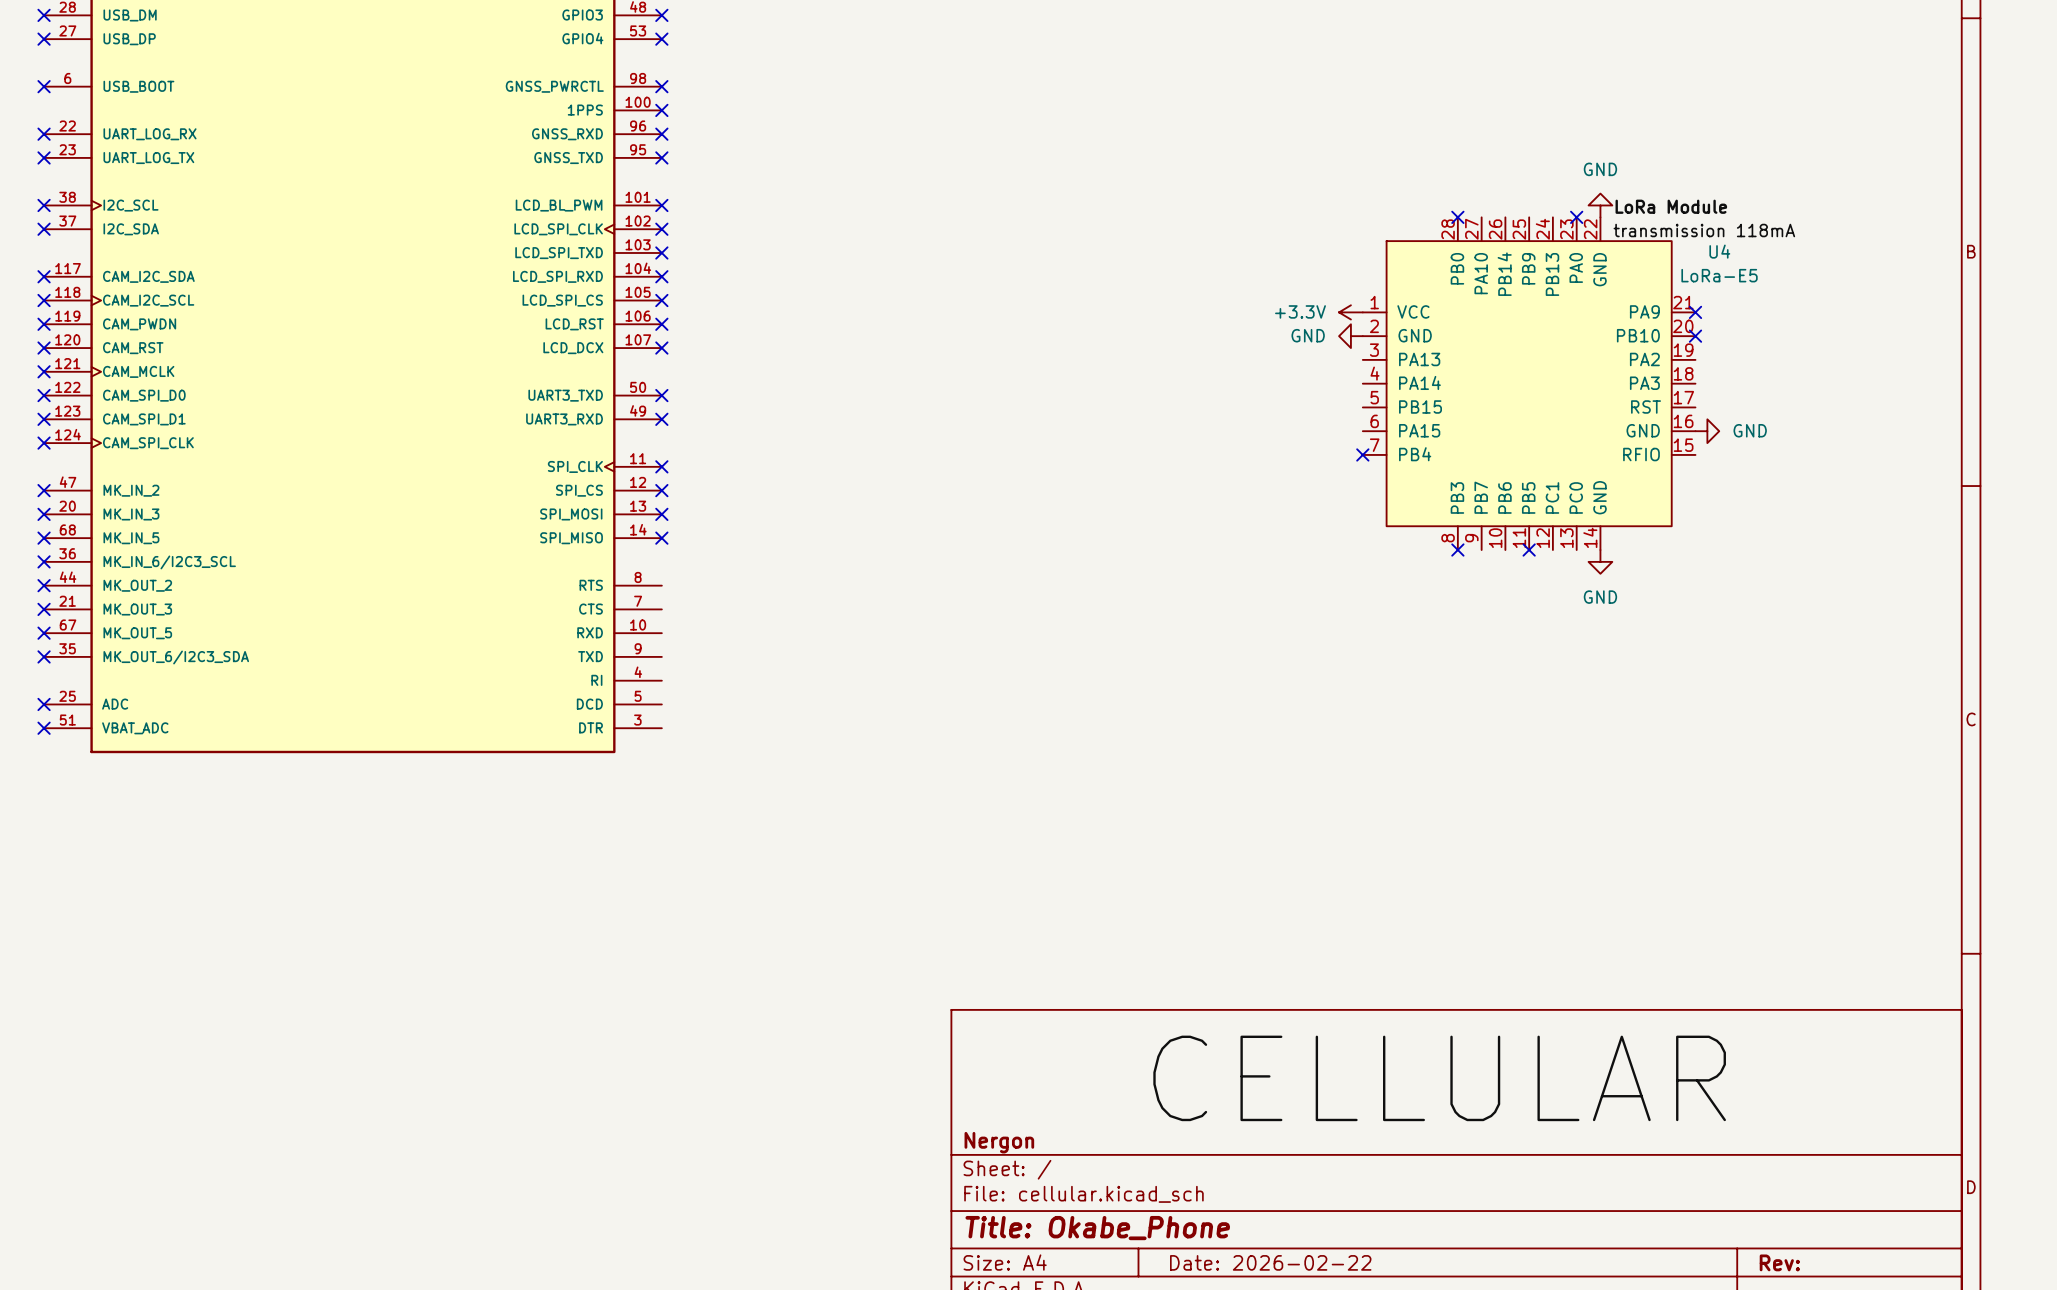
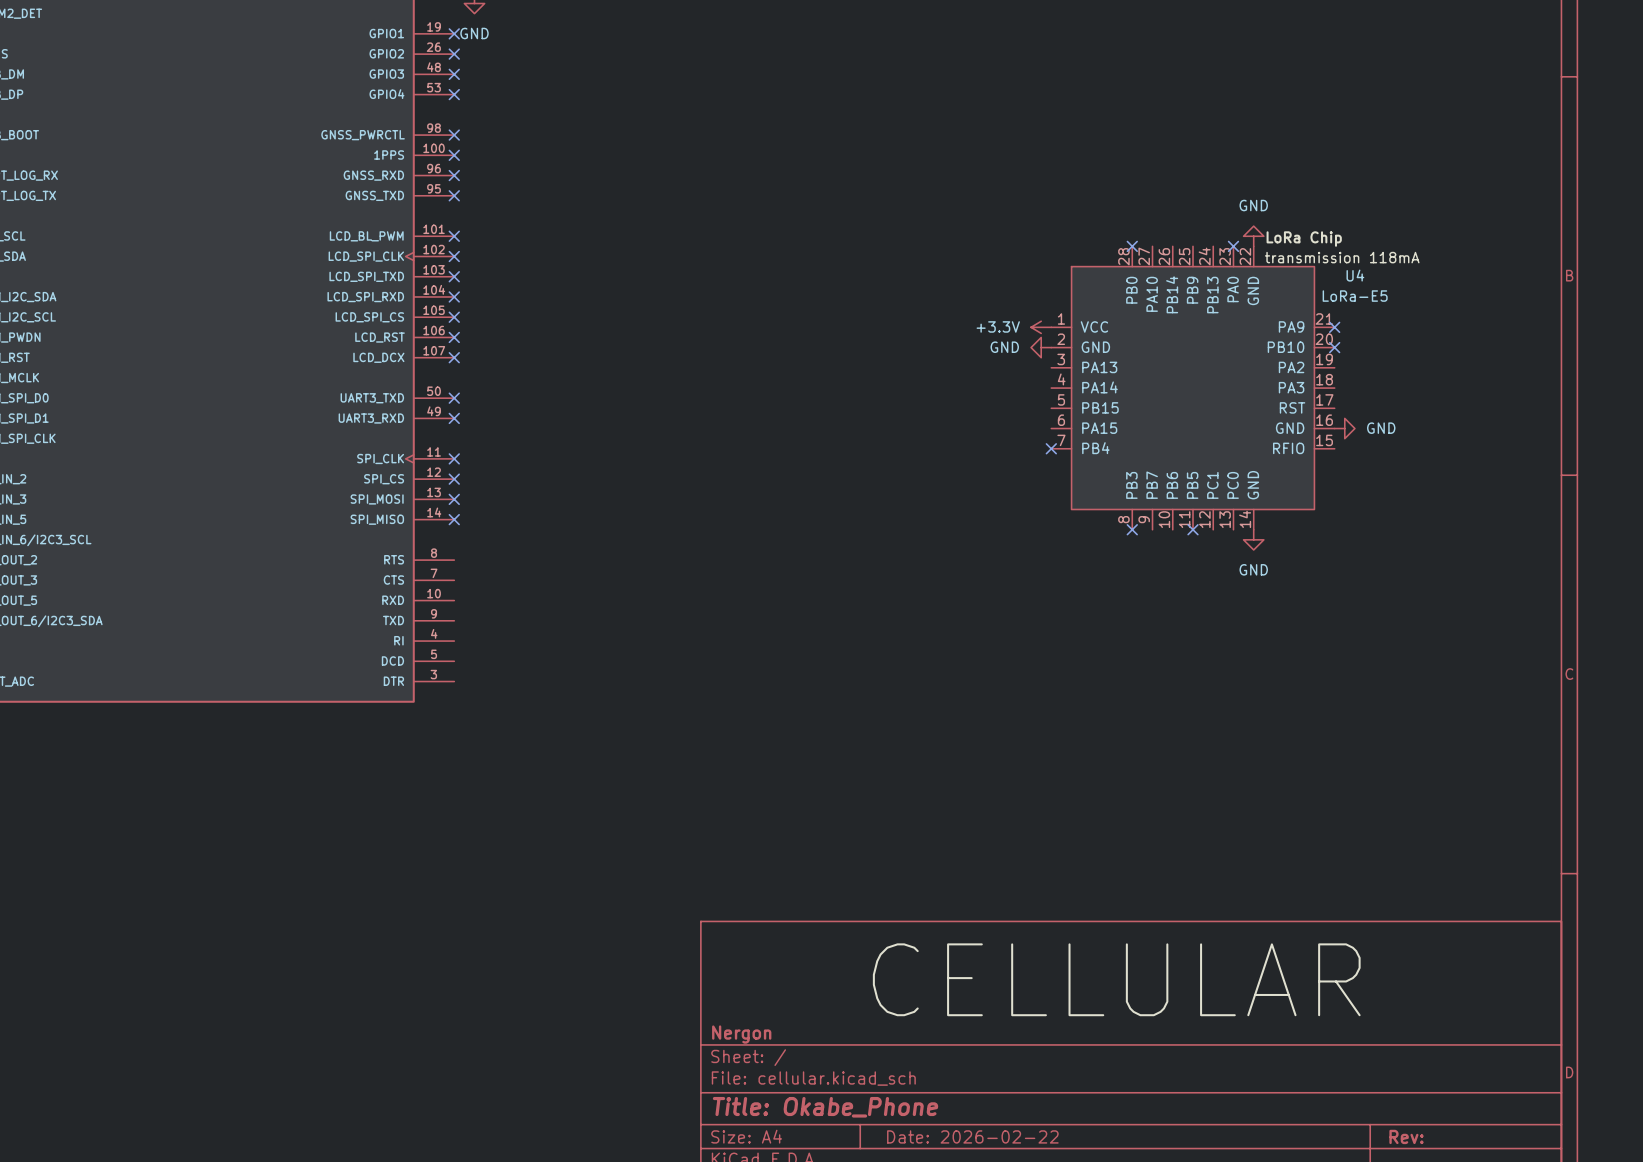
label: LoRa Module (1671, 206) -> LoRa Chip (1304, 239)

